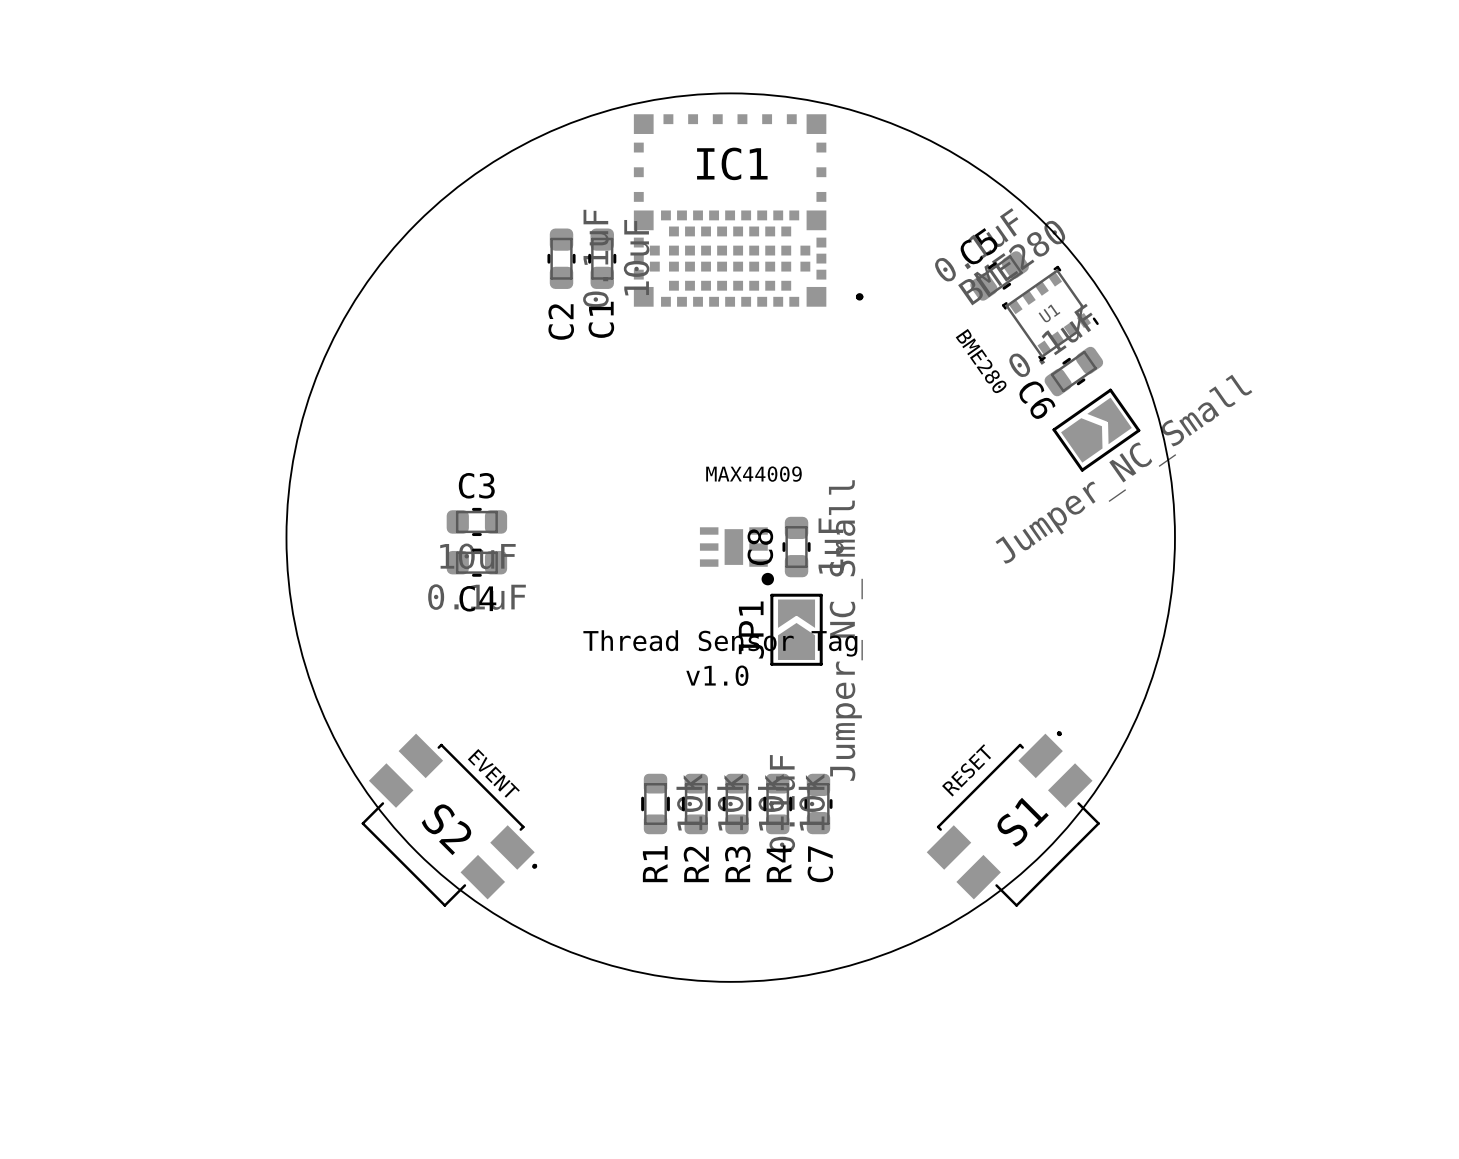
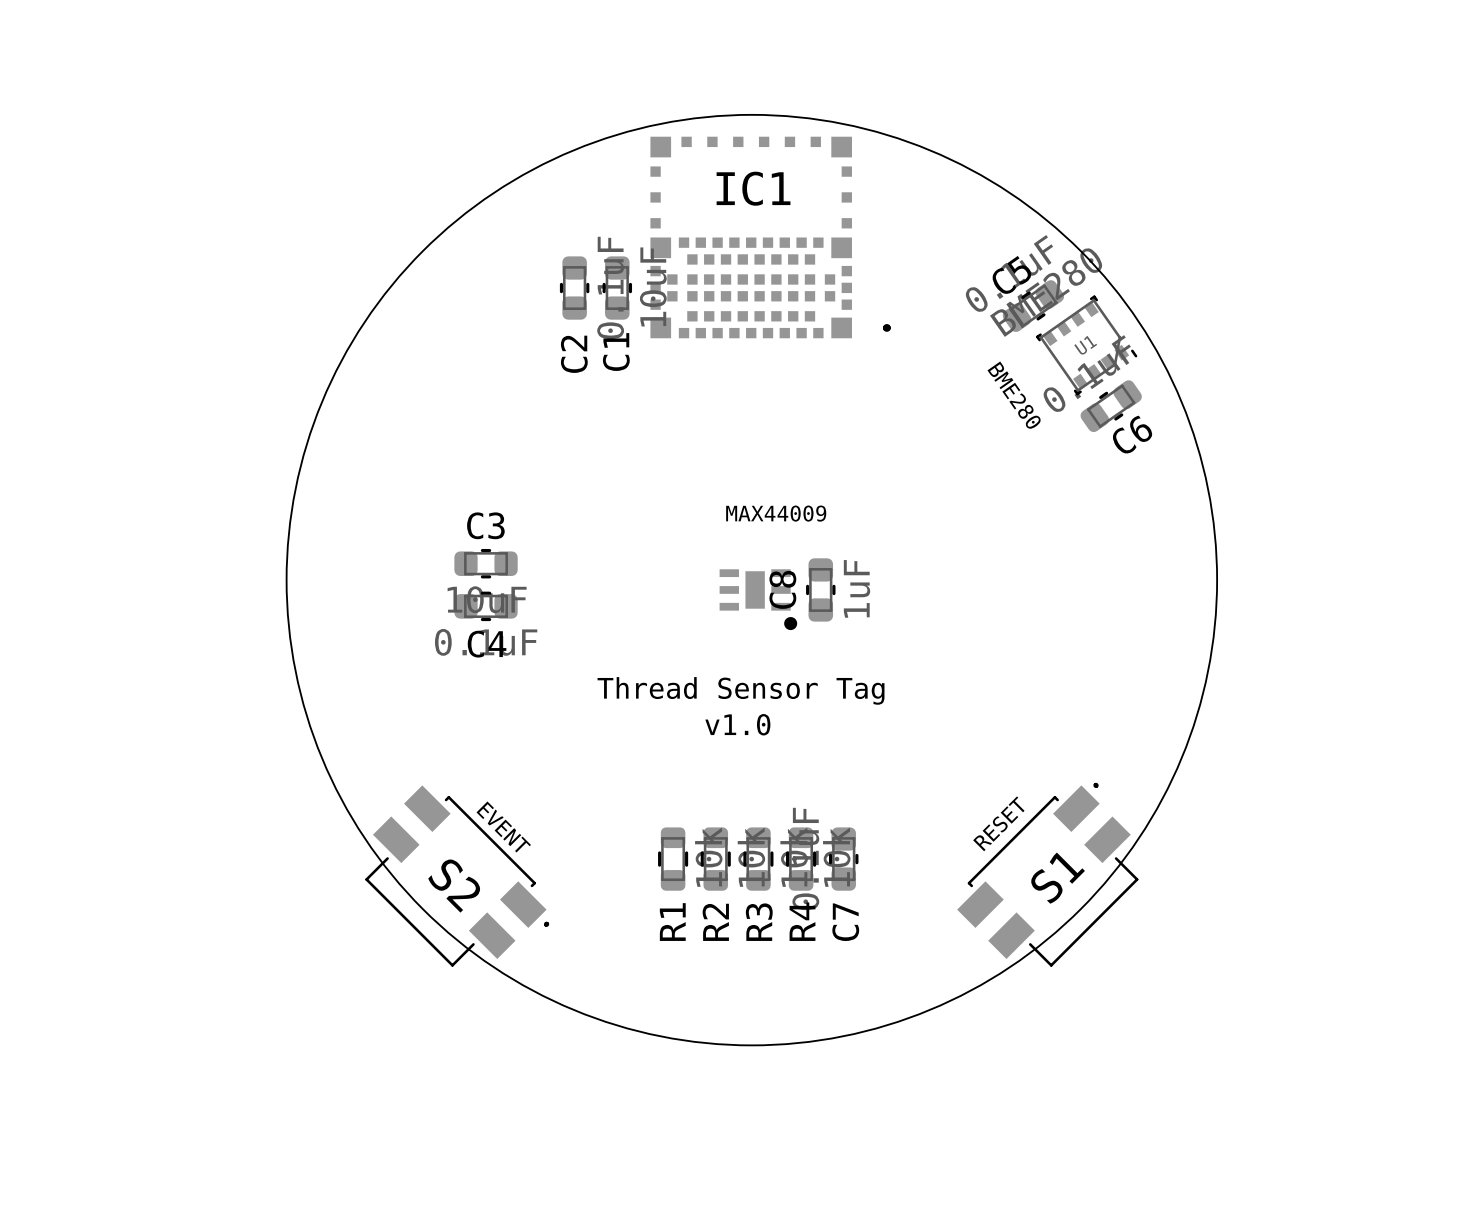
C6 name rotation: 0° (1036, 400) -> 90° counterclockwise (1132, 435)
part: Jumper_NC_Small (1096, 430) -> none
JP1: Jumper_NC_Small (796, 629) -> none

